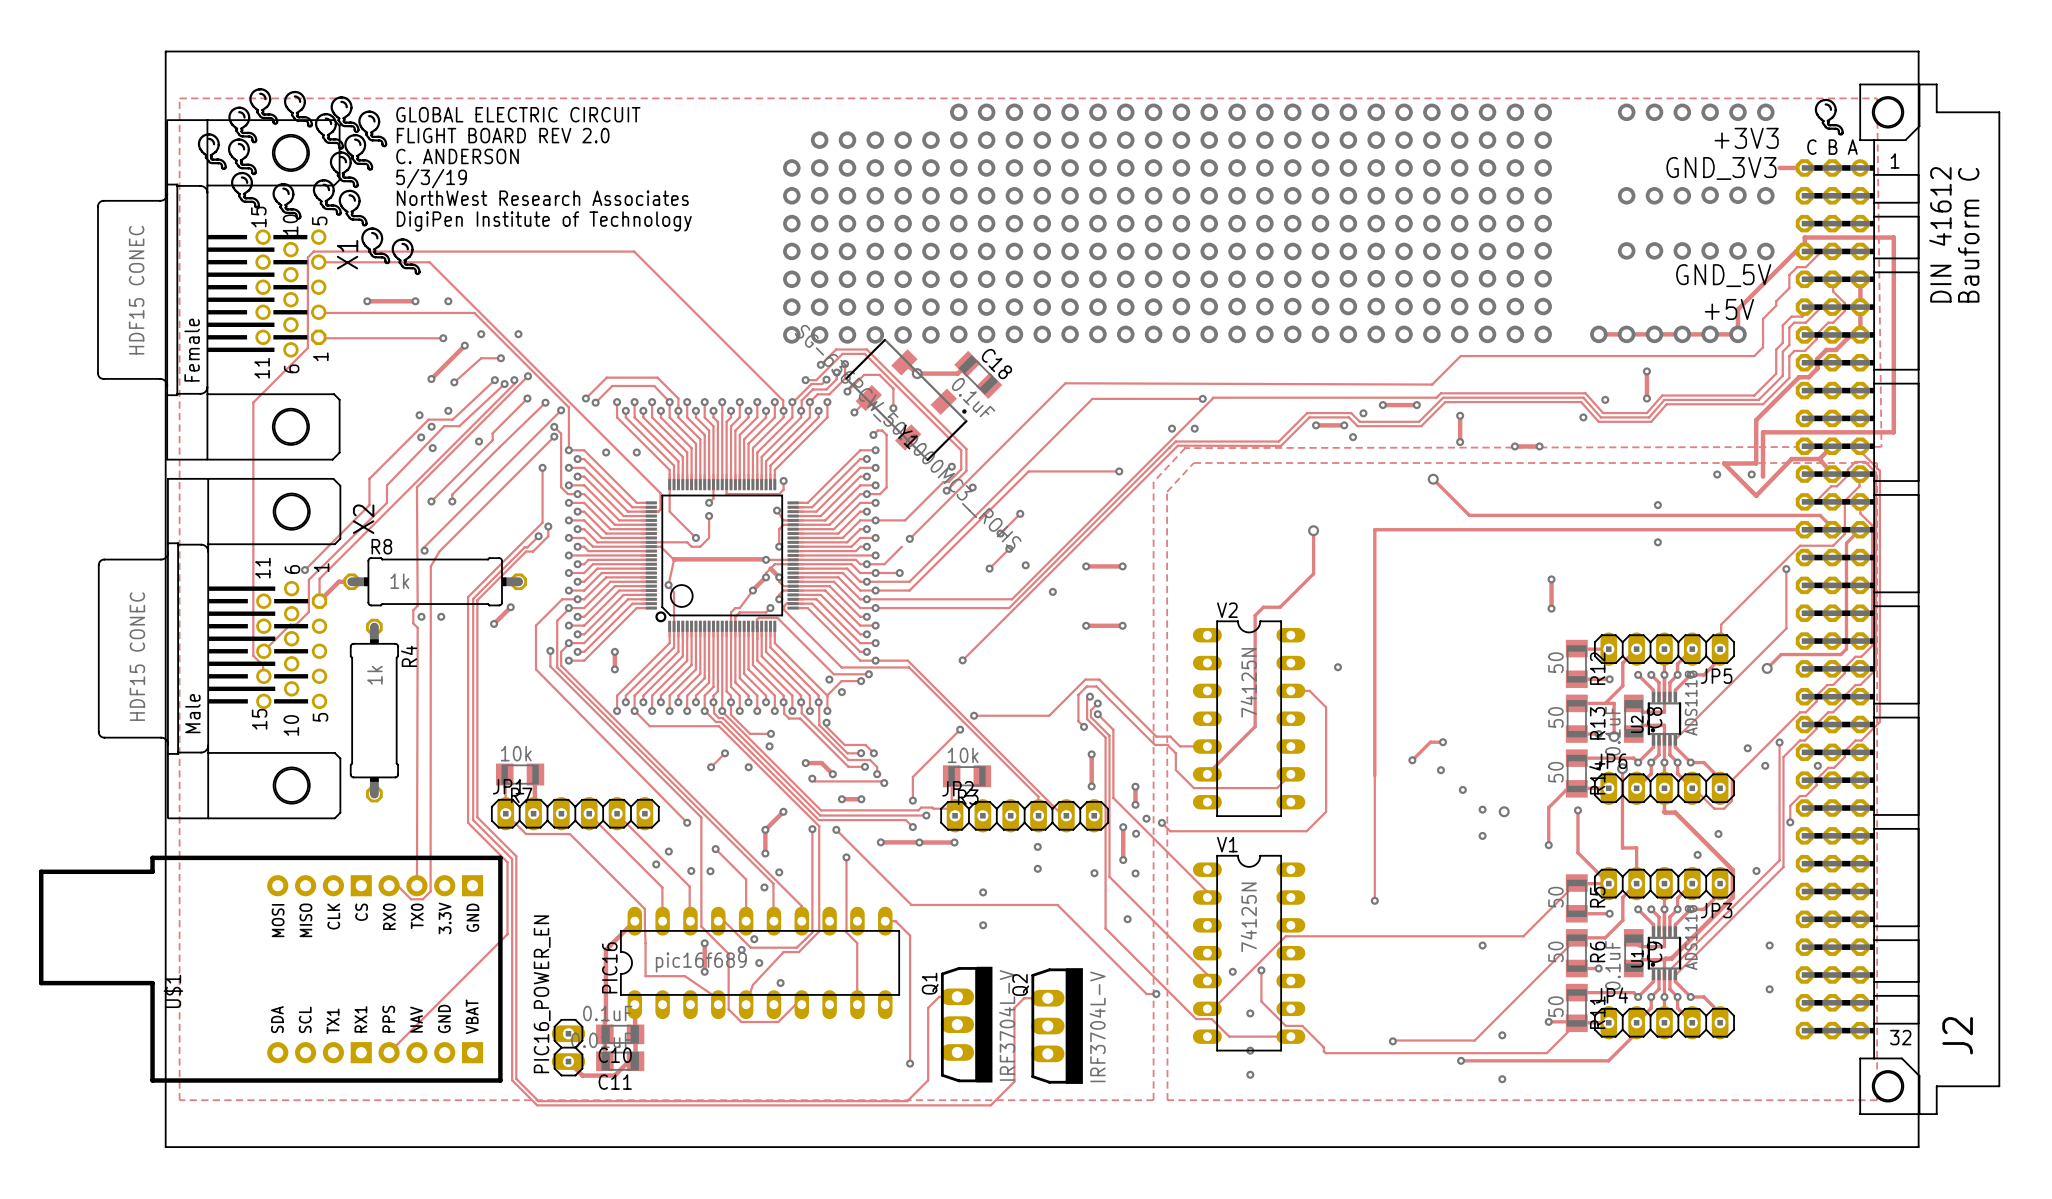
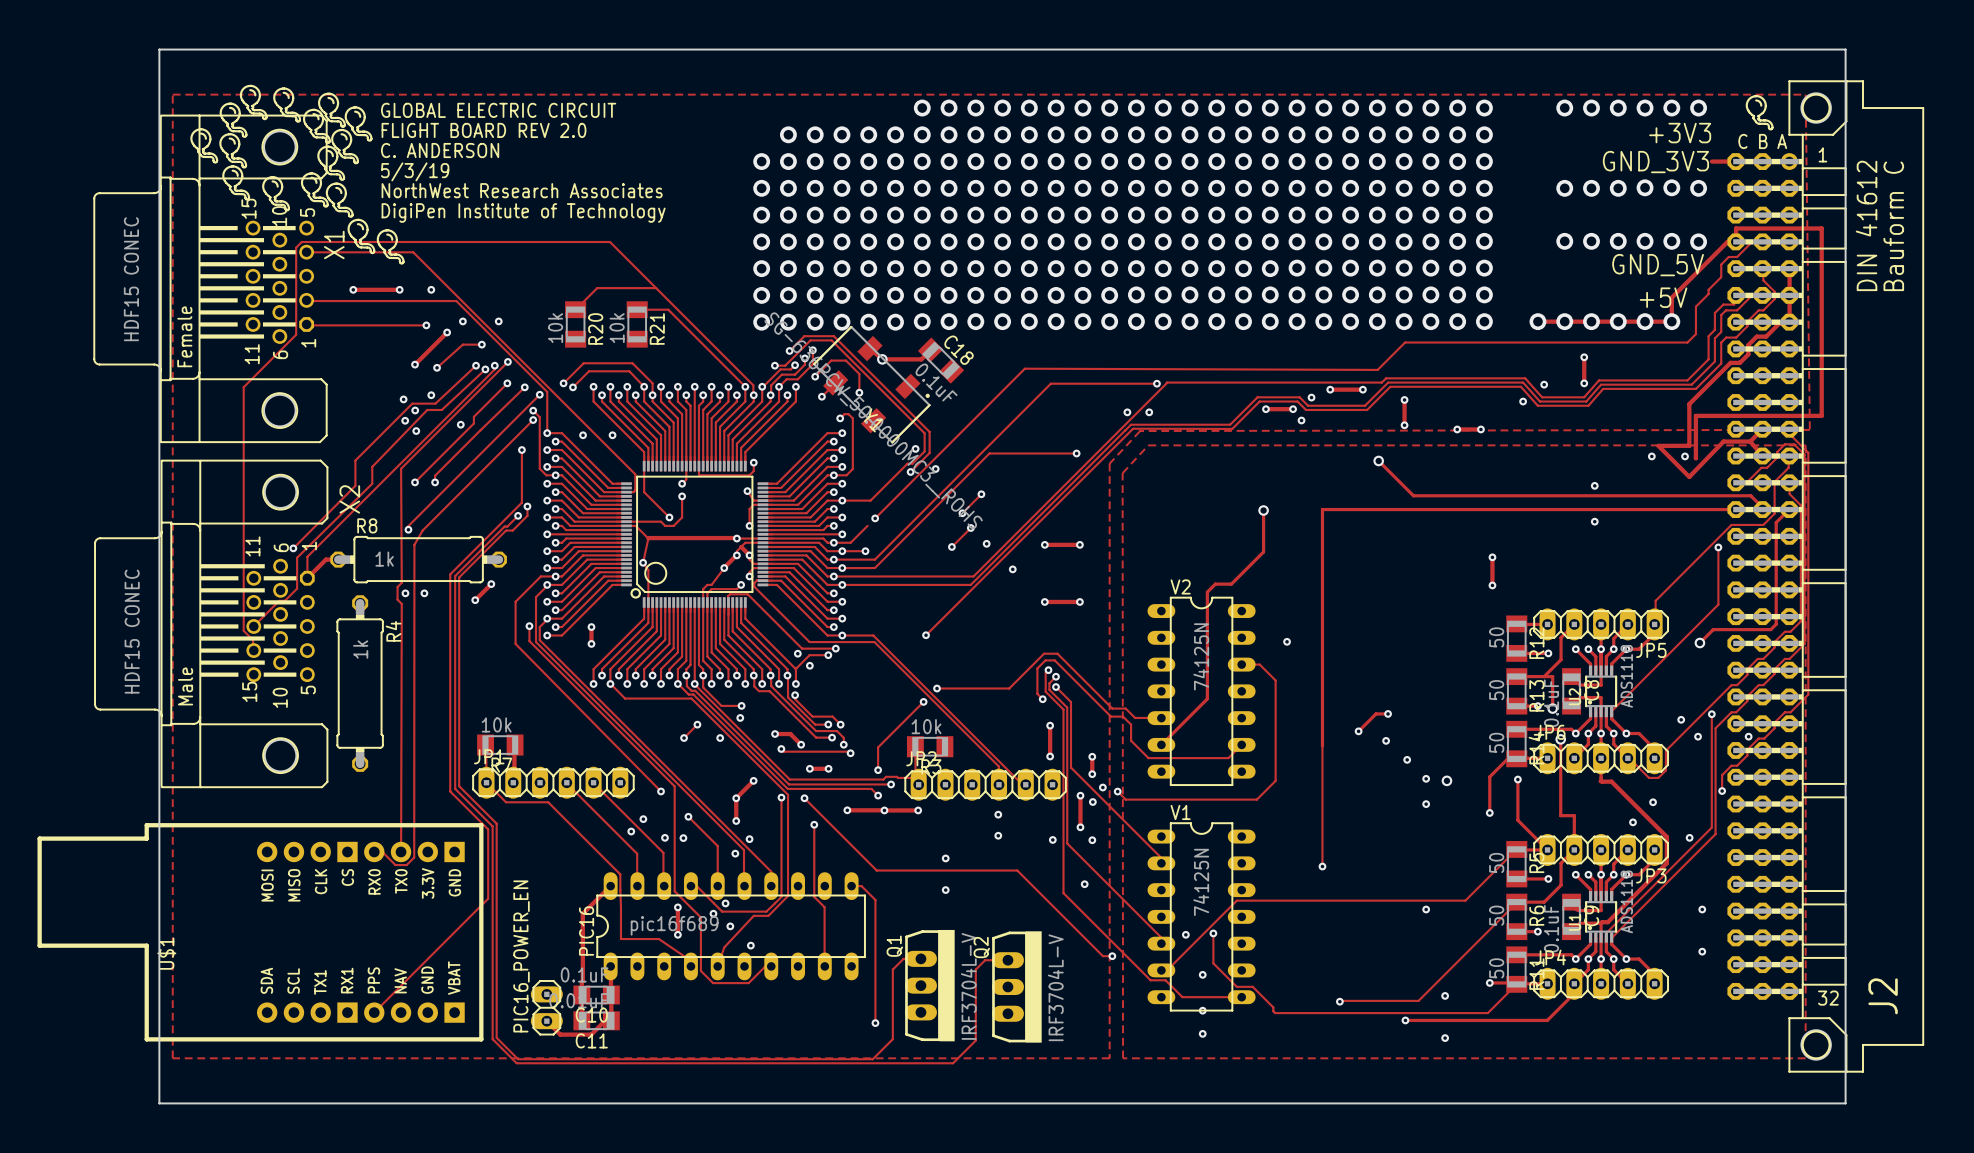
track: none -> (656, 288) (597, 288) (575, 309)
track: none -> (637, 309) (668, 309) (745, 386)
R20: none -> 10k (575, 324)
R21: none -> 10k (637, 324)

